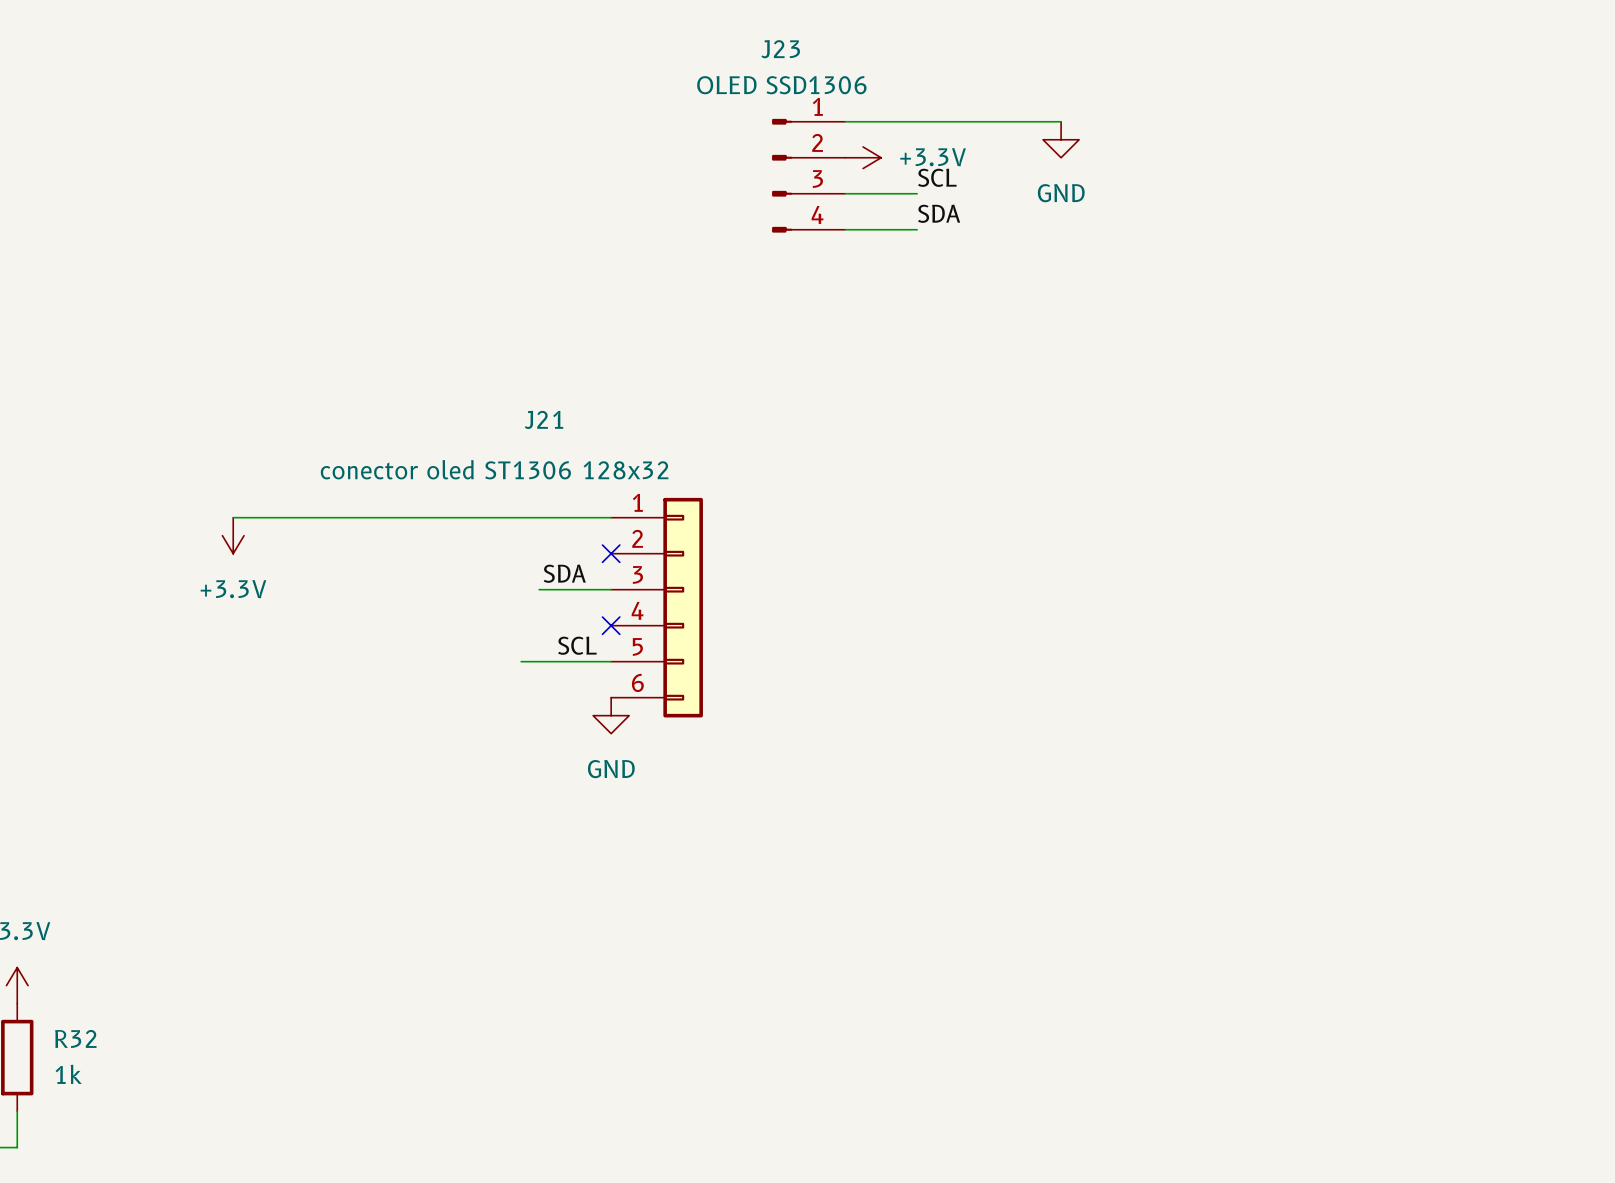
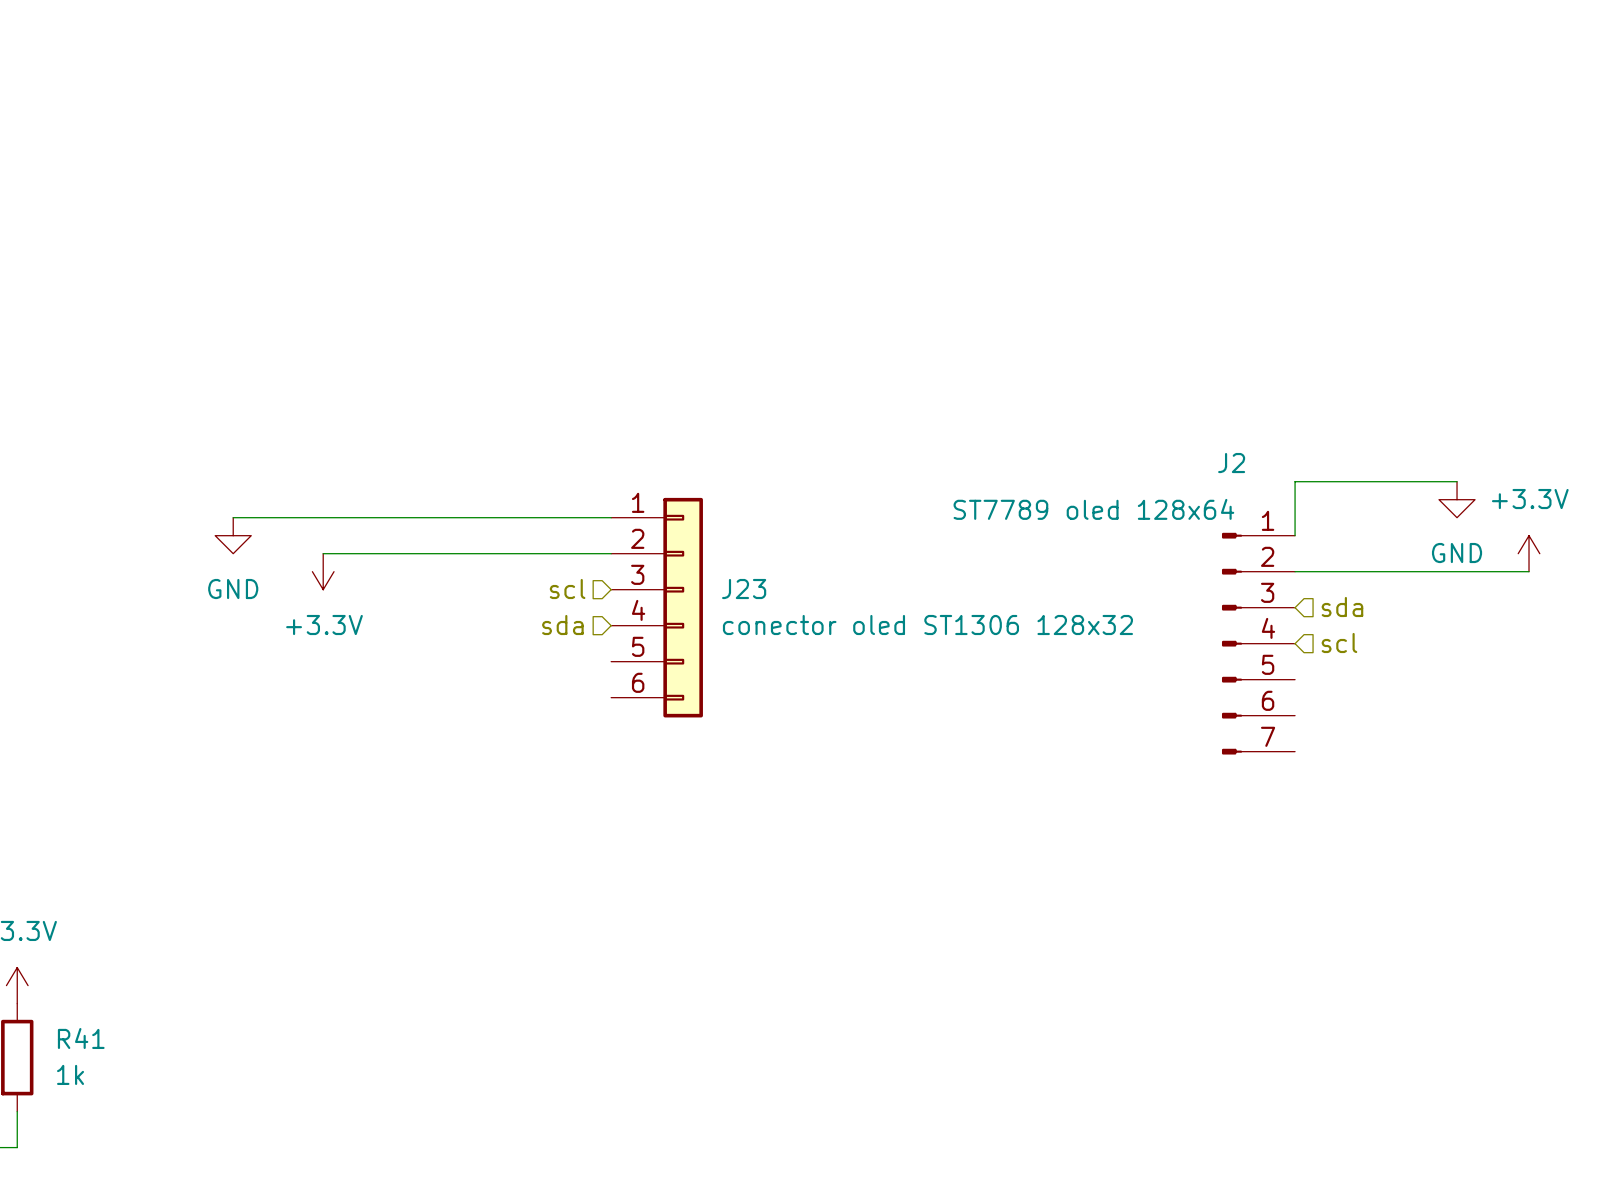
wire: (845, 121) (1061, 121) -> none
power symbol: GND (1061, 139) -> none
power symbol: +3.3V (863, 157) -> none
J23: OLED SSD1306 (808, 175) -> none
label: SCL (937, 177) -> none
wire: (845, 193) (917, 193) -> none
label: SDA (939, 213) -> none
wire: (845, 229) (917, 229) -> none
J21 name: J21 (544, 419) -> J23 (744, 589)
J21 value position: conector oled ST1306 128x32 (494, 469) -> conector oled ST1306 128x32 (927, 625)
wire: none -> (1457, 481) (1295, 481) (1295, 535)
power symbol: none -> GND (1457, 499)
power symbol: +3.3V (233, 535) -> GND (233, 535)
wire: none -> (323, 553) (611, 553)
no-connect mark: (611, 553) -> none
power symbol: none -> +3.3V (1529, 553)
power symbol: none -> +3.3V (323, 571)
wire: none -> (1295, 571) (1529, 571)
label: SDA (564, 573) -> none
hierarchical label: none -> scl (567, 589)
wire: (539, 589) (611, 589) -> none
hierarchical label: none -> sda (1342, 607)
hierarchical label: none -> sda (562, 625)
no-connect mark: (611, 625) -> none
hierarchical label: none -> scl (1339, 642)
J2: none -> ST7789 oled 128x64 (1258, 643)
label: SCL (577, 645) -> none
wire: (521, 661) (611, 661) -> none
power symbol: GND (611, 715) -> none
R32 name: R32 (75, 1038) -> R41 (81, 1038)

